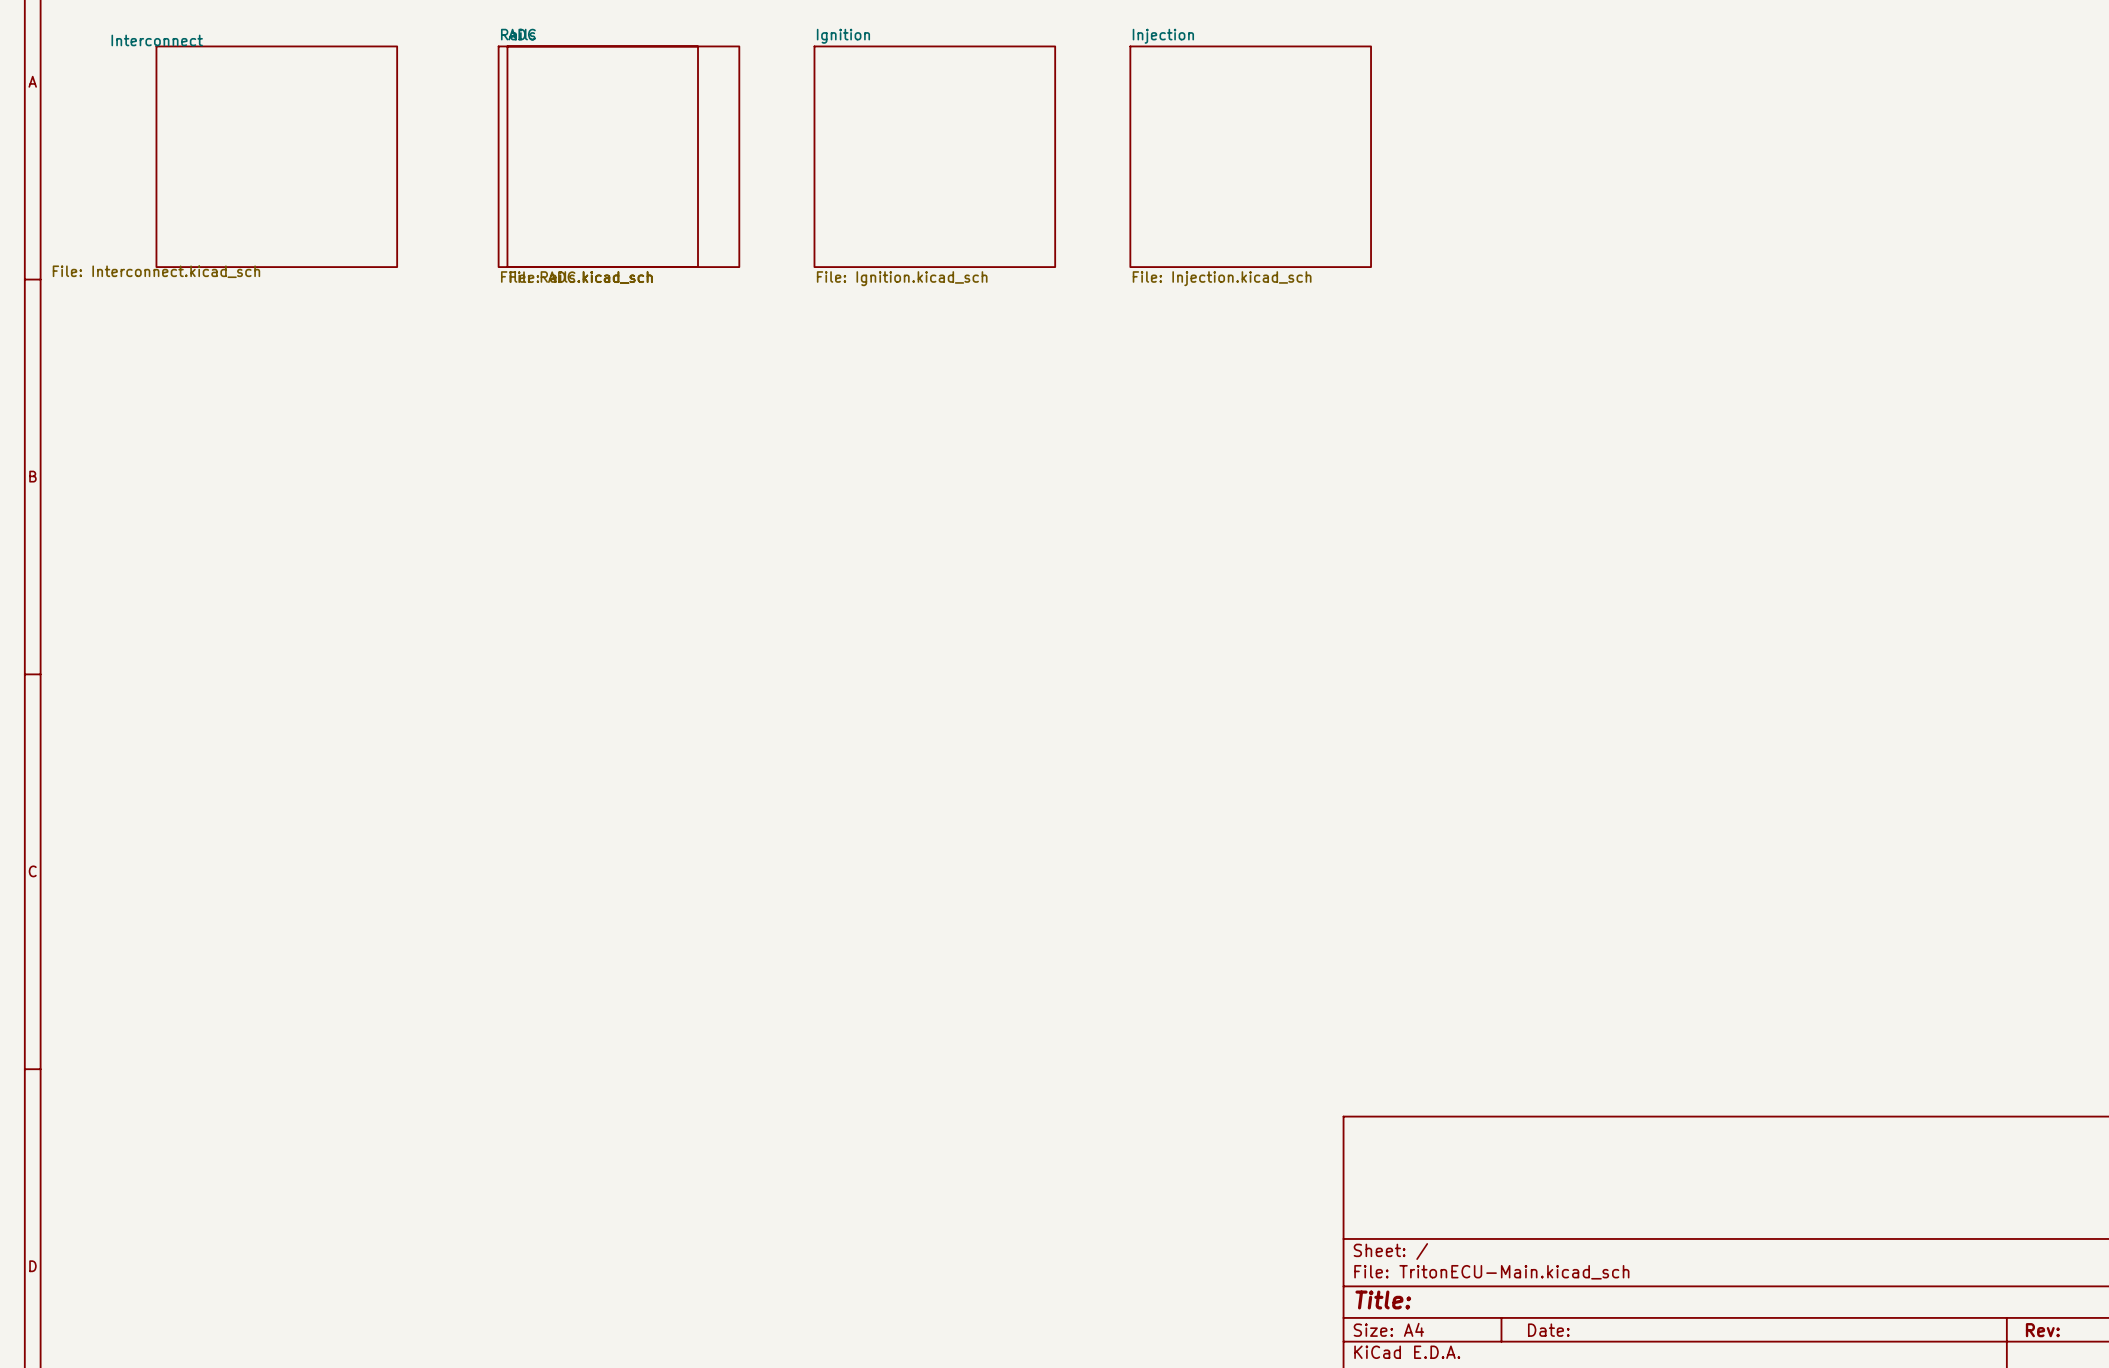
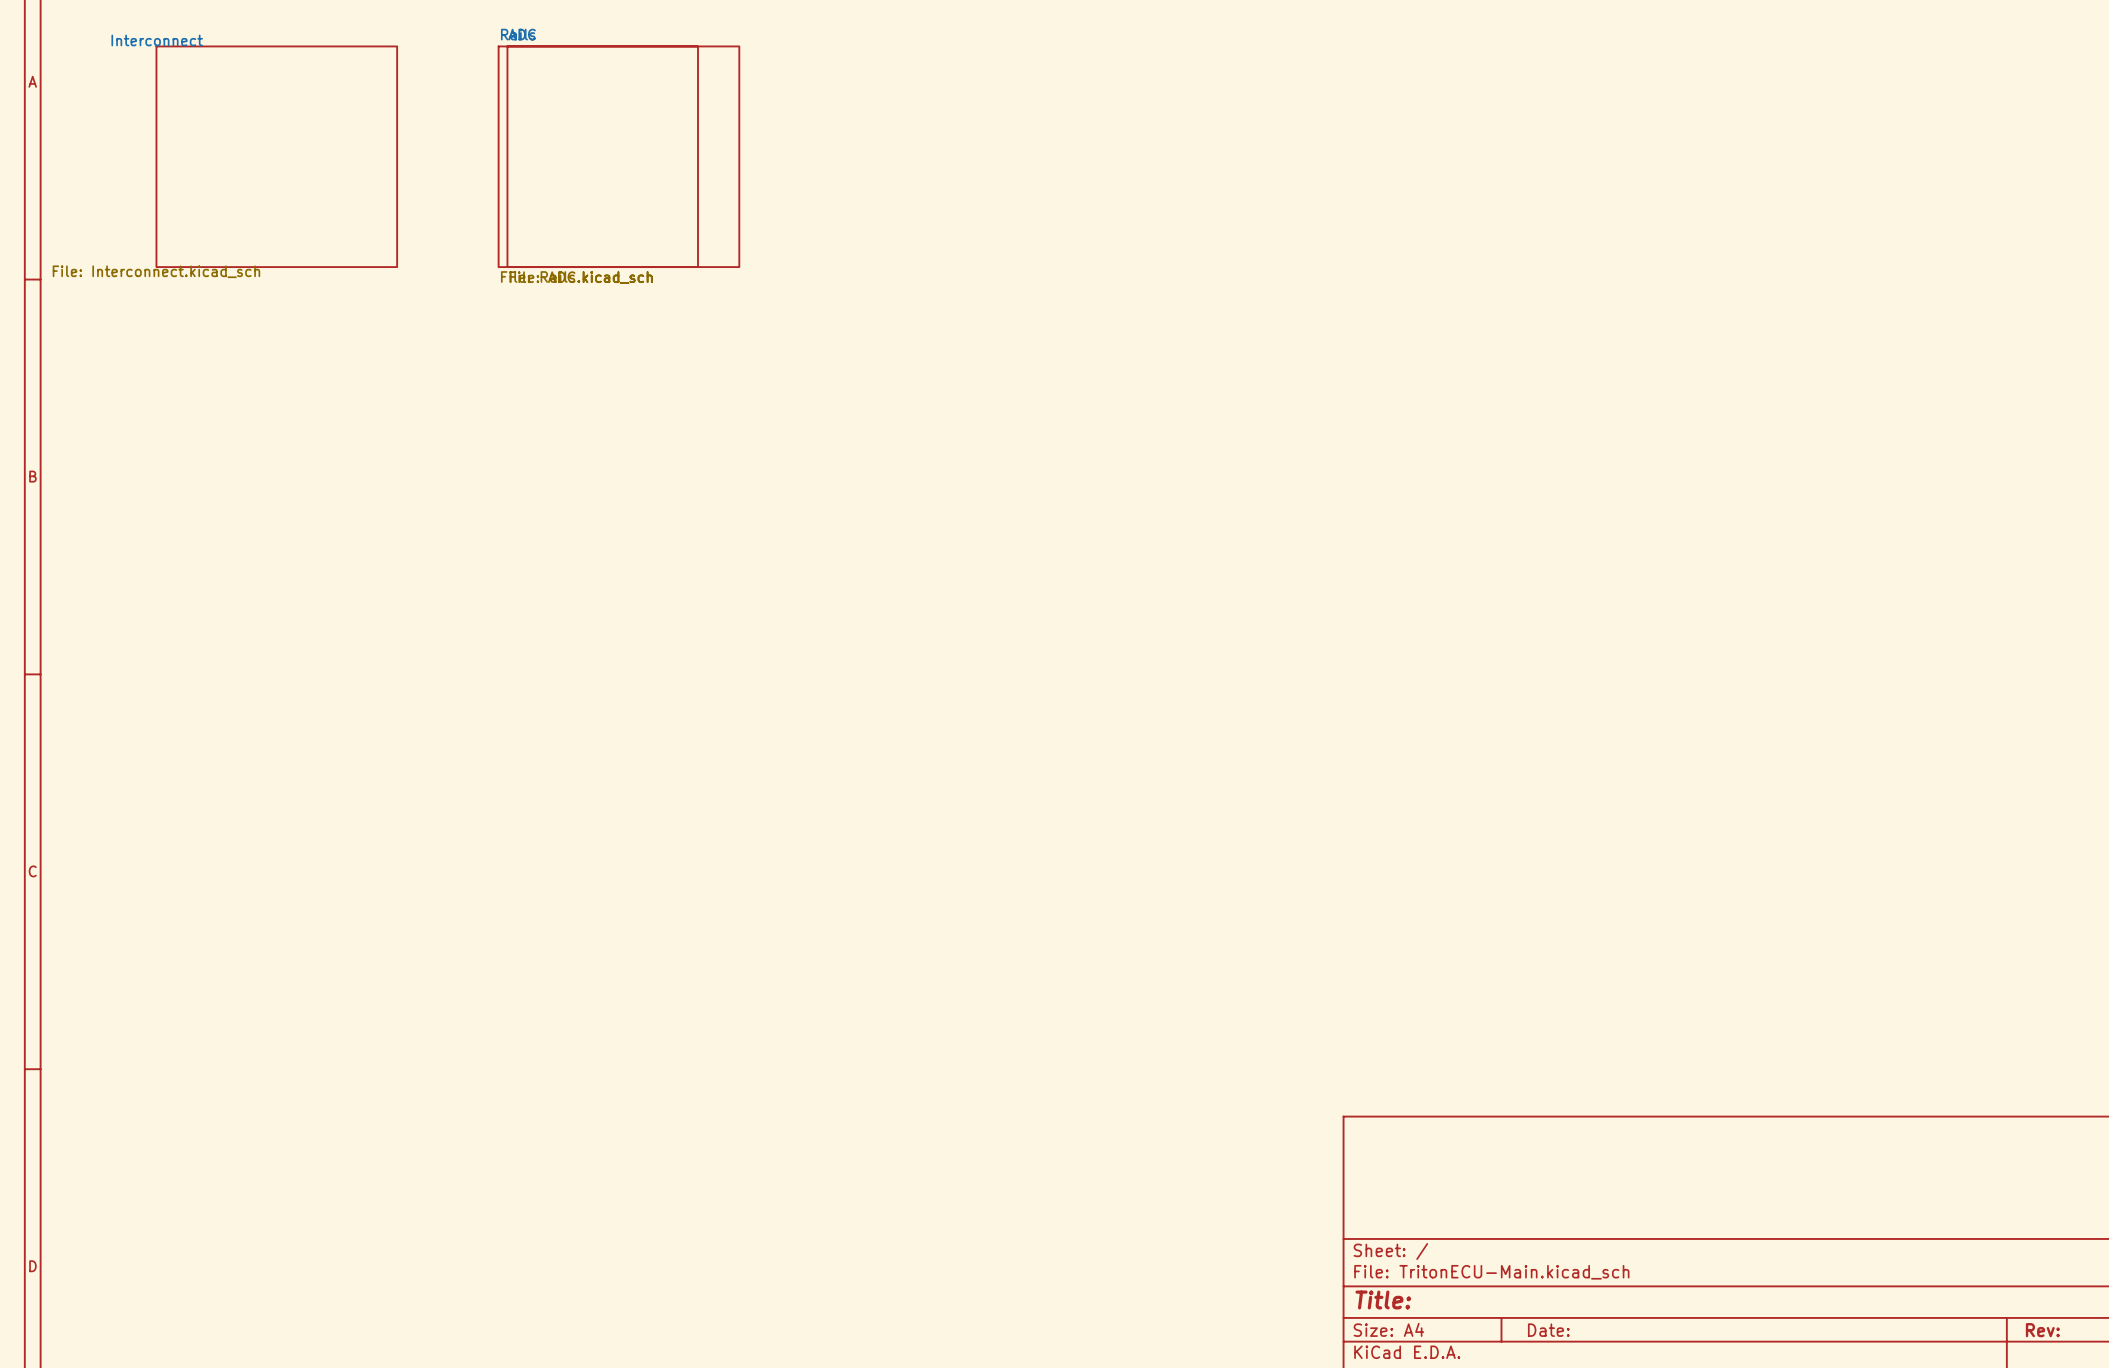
sheet Ignition: File: Ignition.kicad_sch (934, 156) -> none
sheet Injection: File: Injection.kicad_sch (1250, 156) -> none

